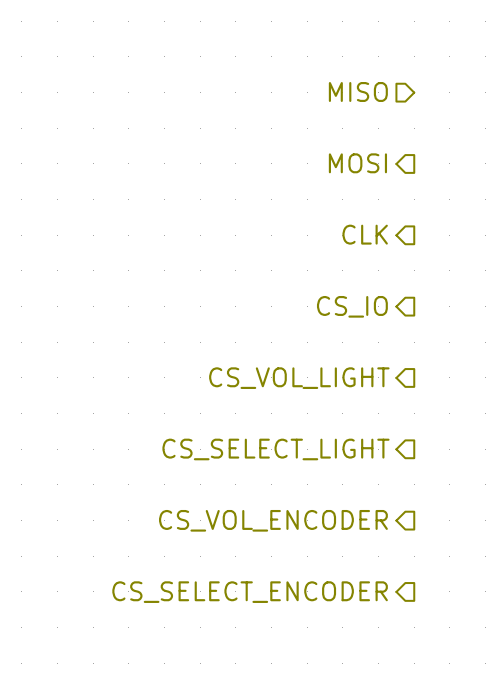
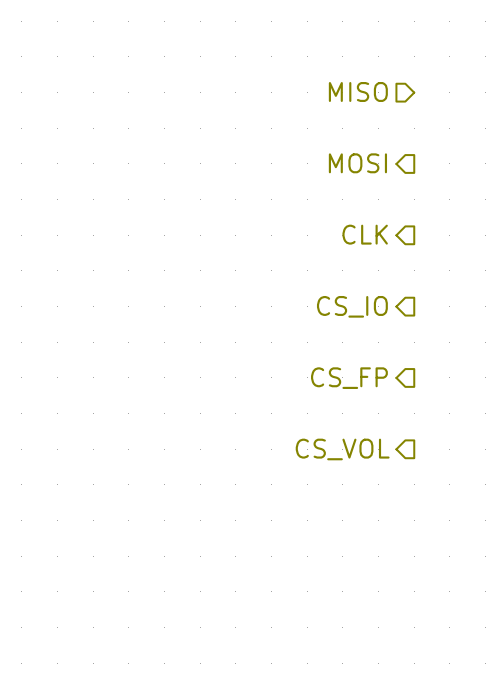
hierarchical label: CS_VOL_LIGHT (299, 378) -> CS_FP (349, 378)
hierarchical label: CS_SELECT_LIGHT (275, 449) -> CS_VOL (342, 449)
hierarchical label: CS_VOL_ENCODER (273, 520) -> none
hierarchical label: CS_SELECT_ENCODER (250, 592) -> none

